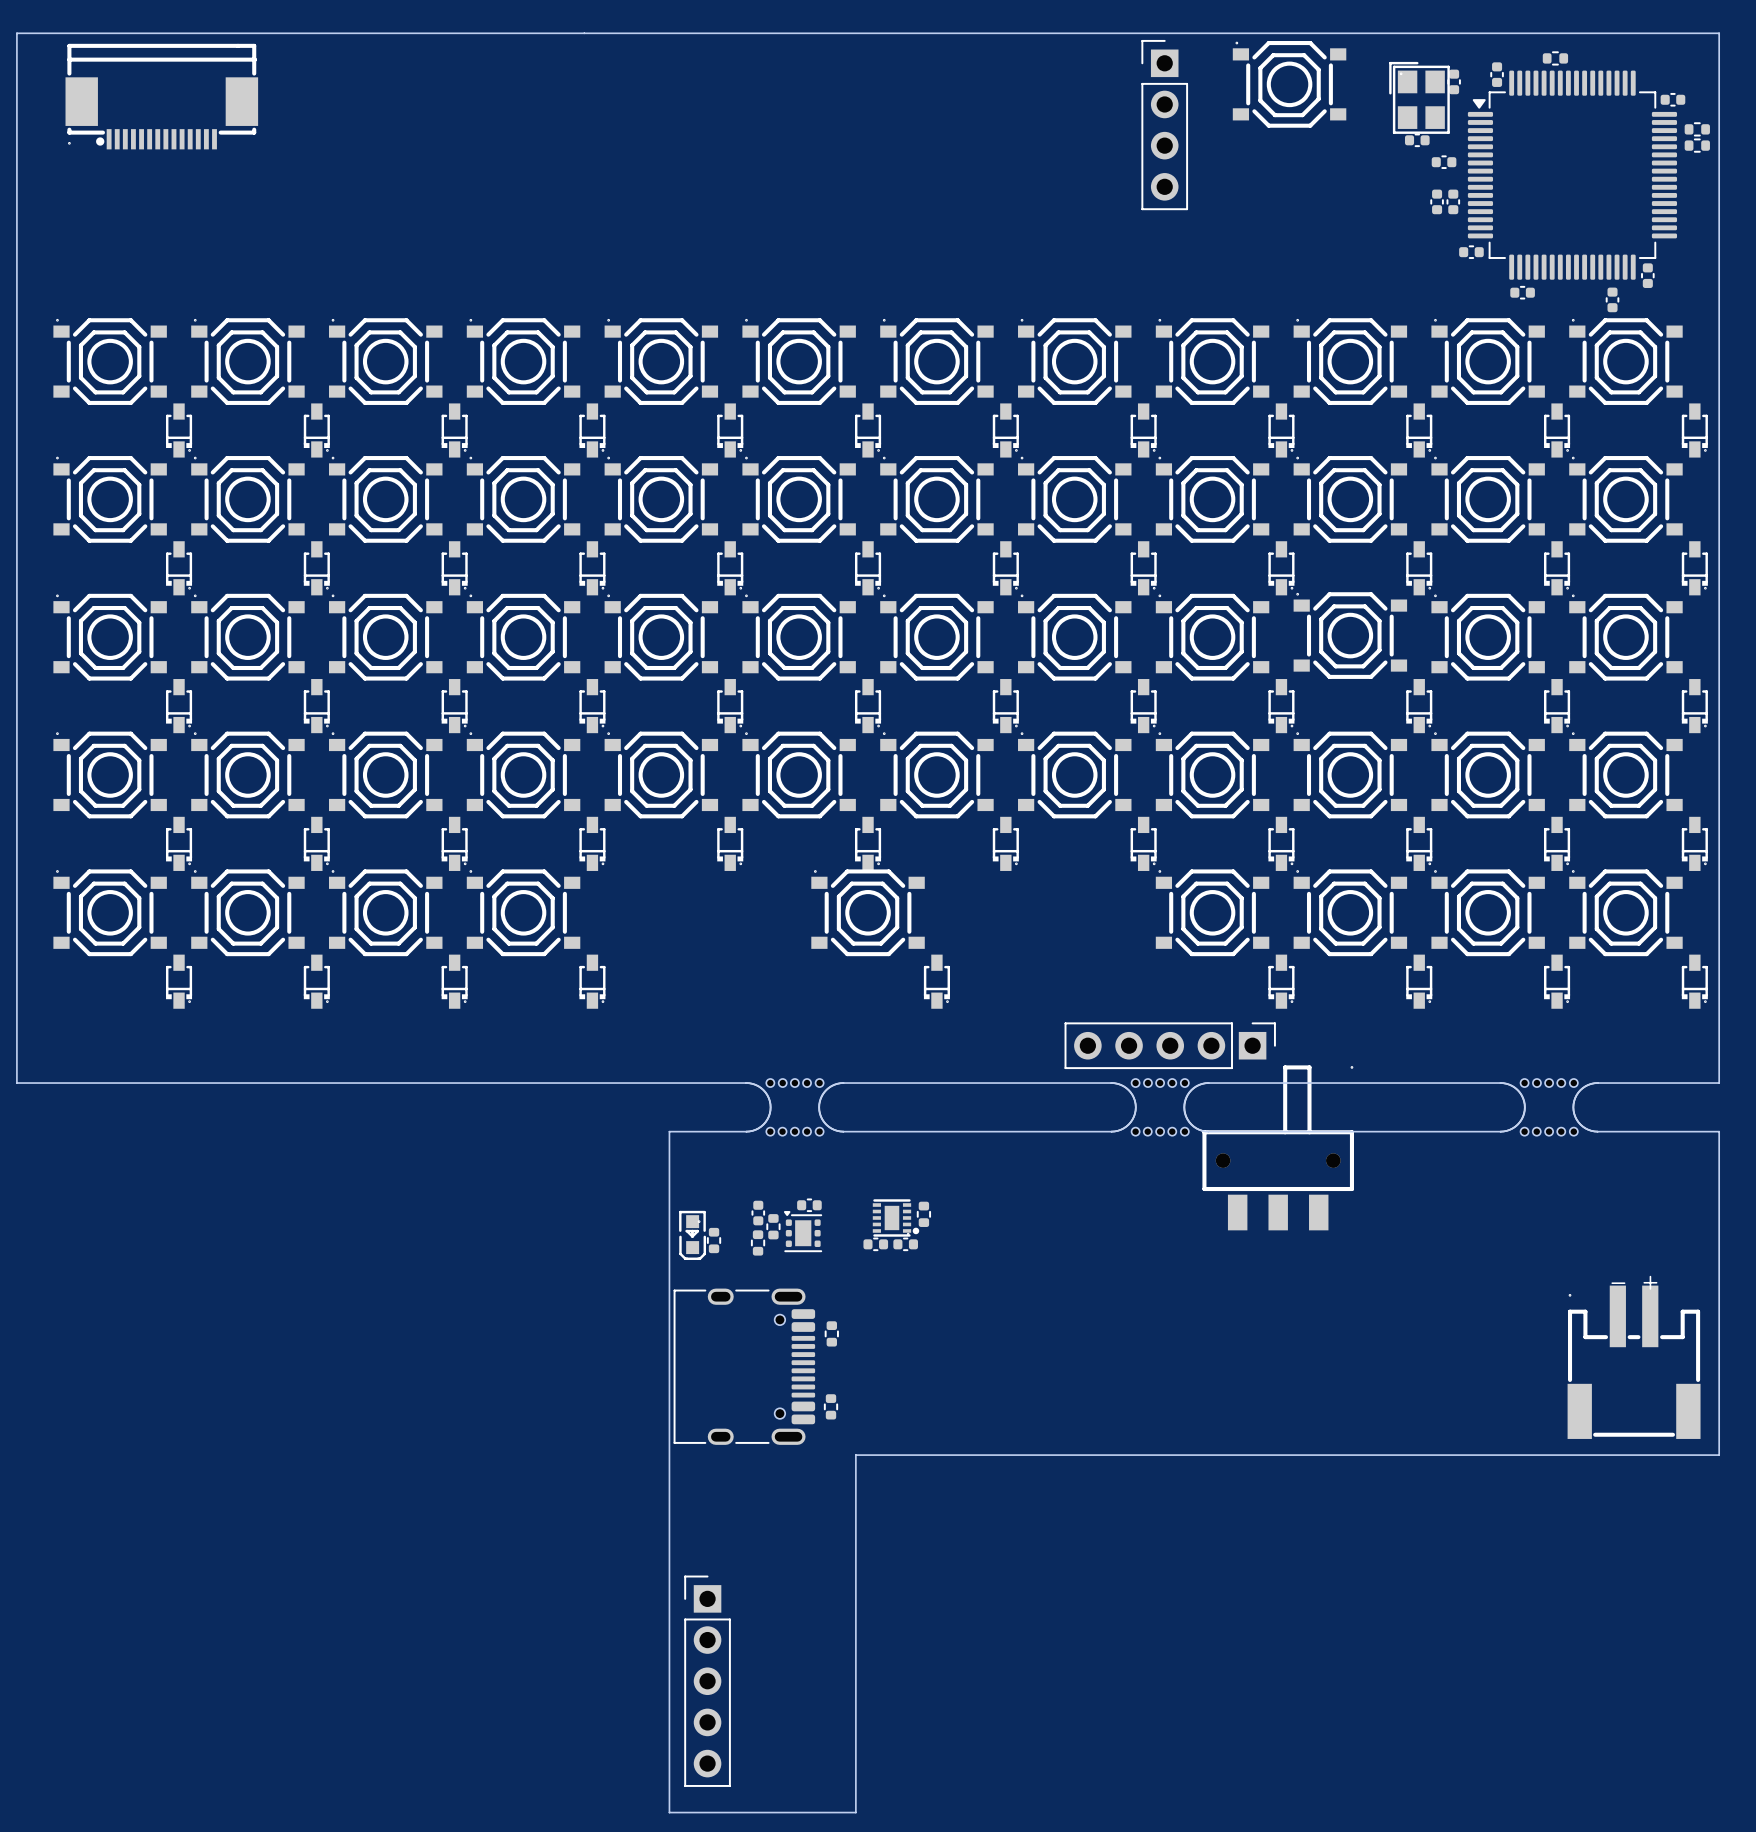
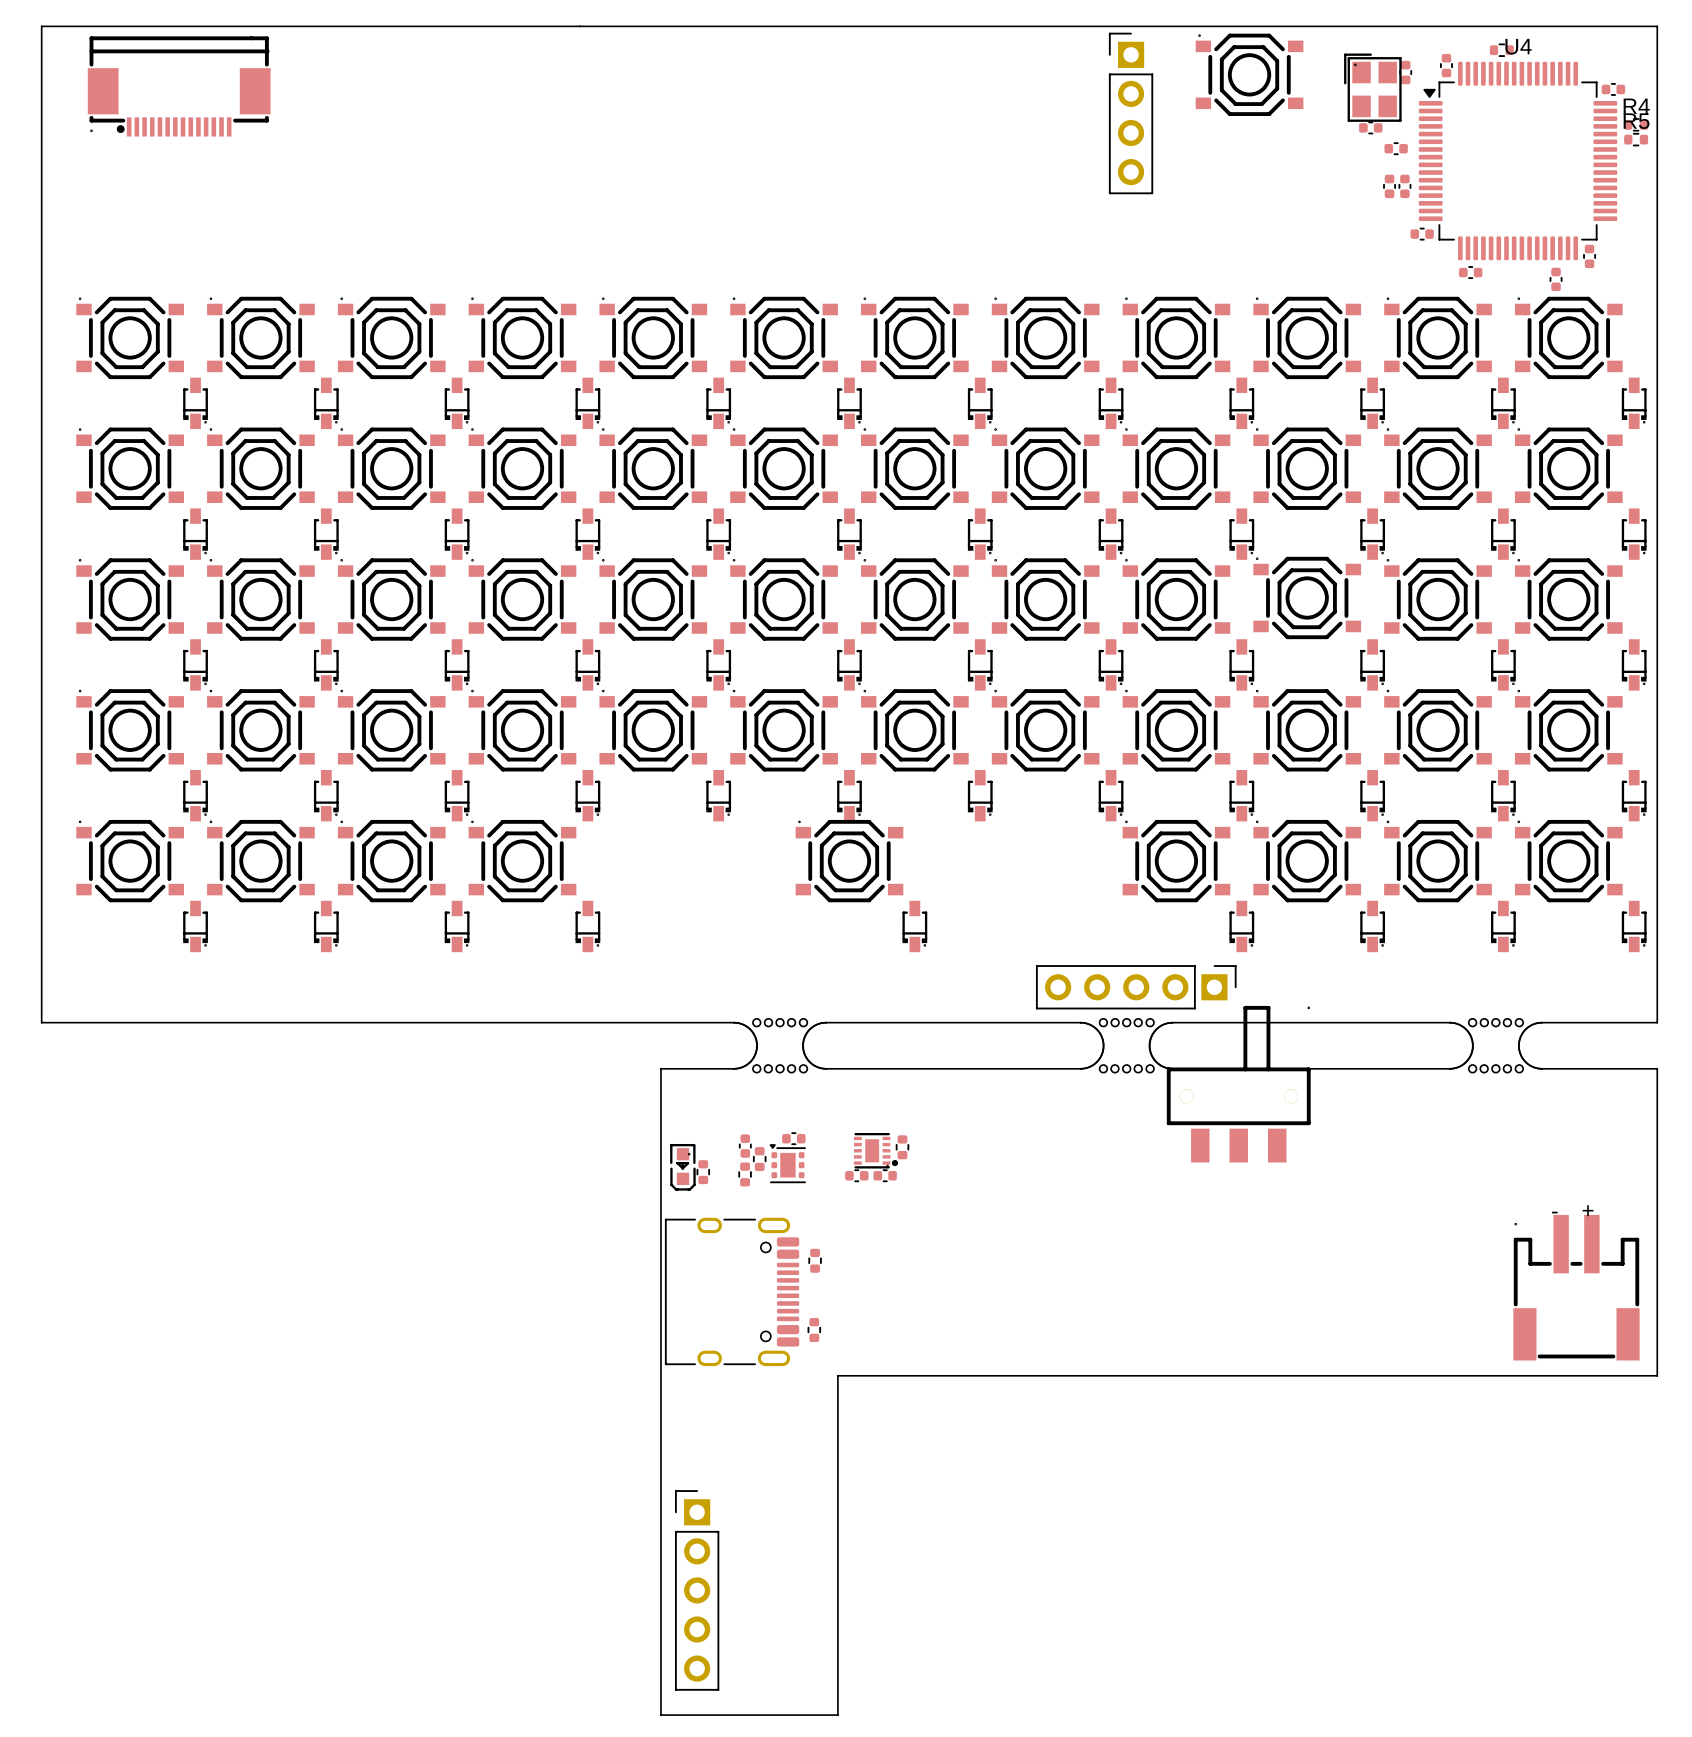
U4 name: none -> U4 (1518, 46)
part: (1697, 129) -> none
R4: none -> (1636, 124)
part: (1697, 145) -> none
R5: none -> (1636, 139)

